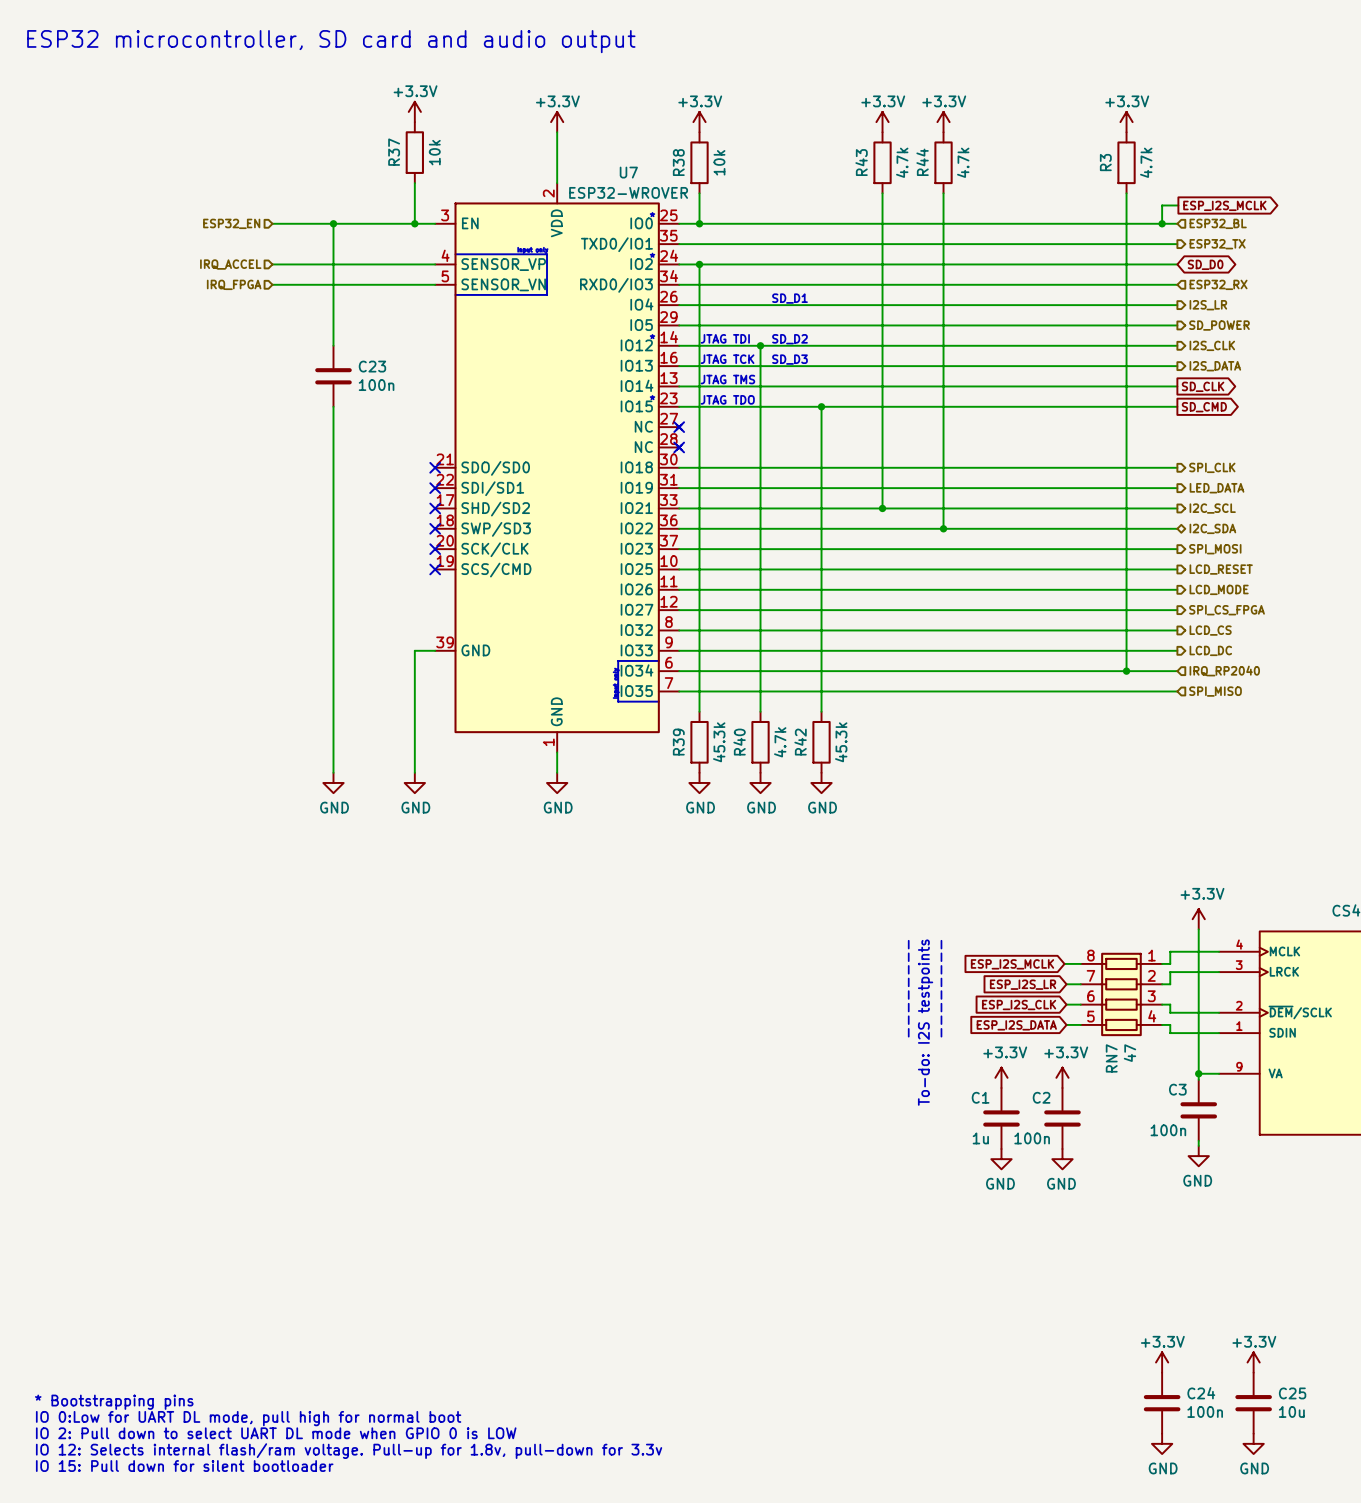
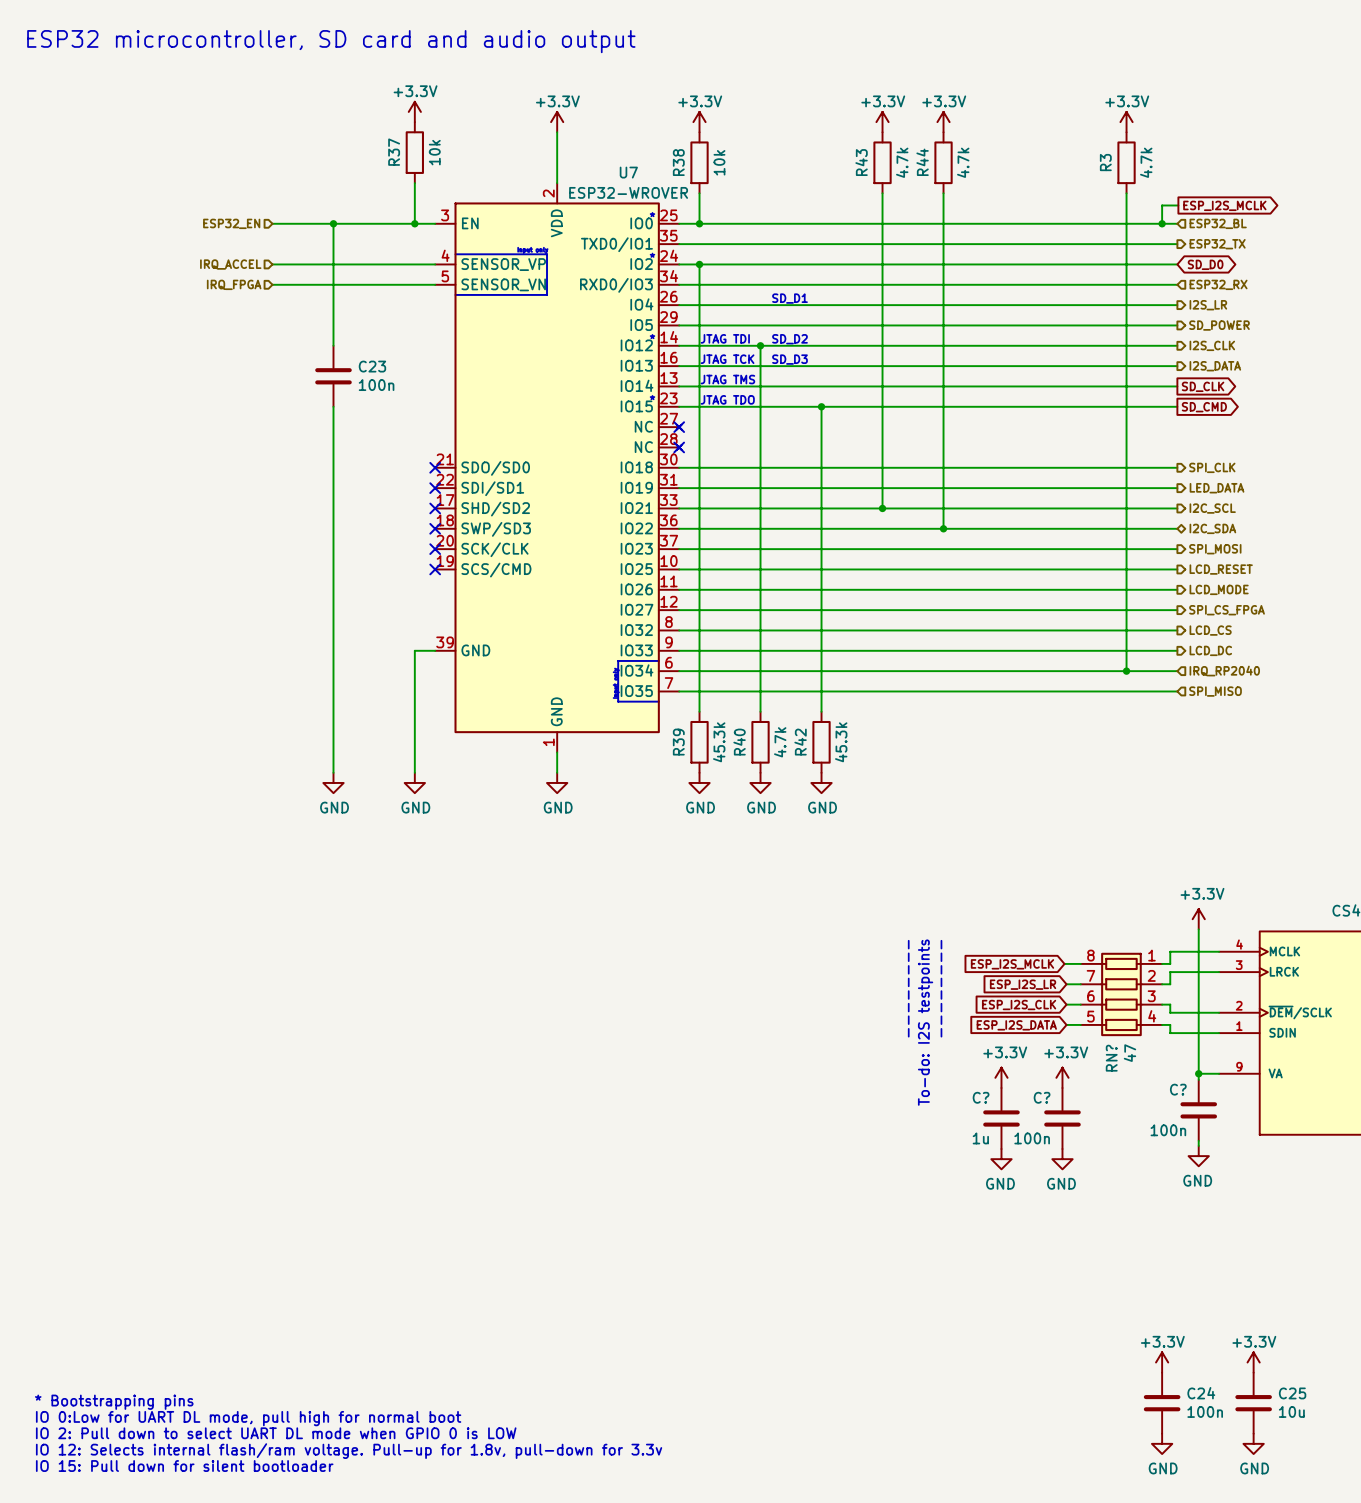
RN7 name: RN7 (1111, 1058) -> RN? (1111, 1058)
C3 name: C3 (1177, 1089) -> C? (1178, 1089)
C1 name: C1 (980, 1097) -> C? (981, 1097)
C2 name: C2 (1041, 1097) -> C? (1042, 1097)

